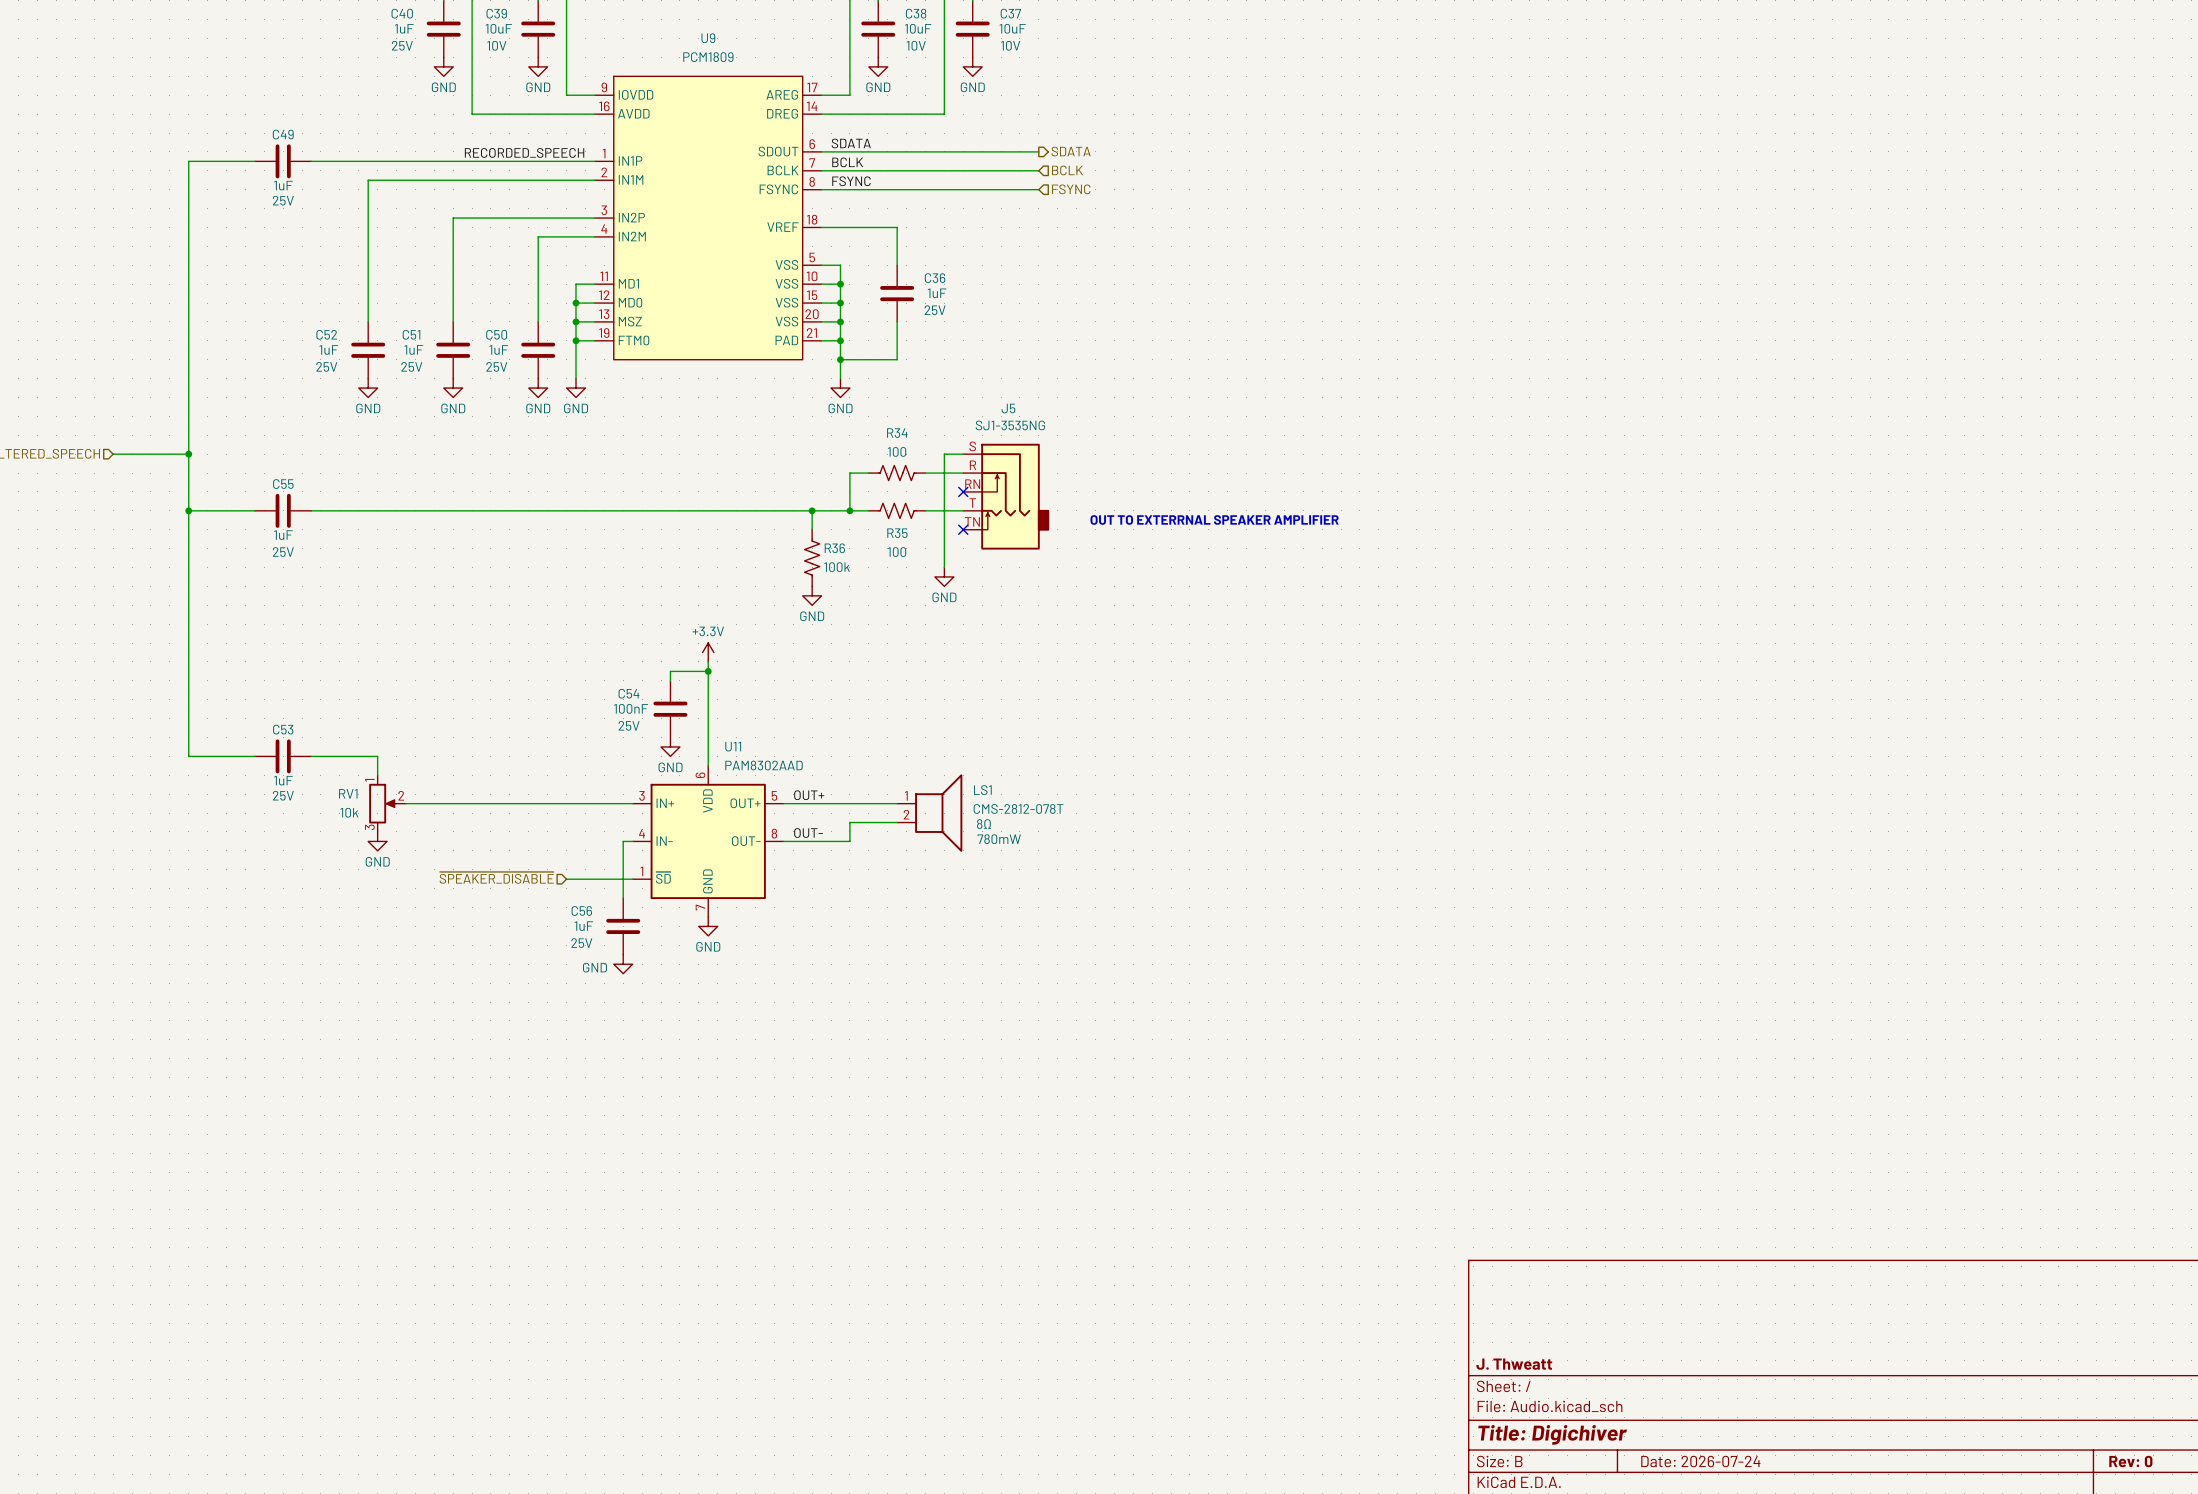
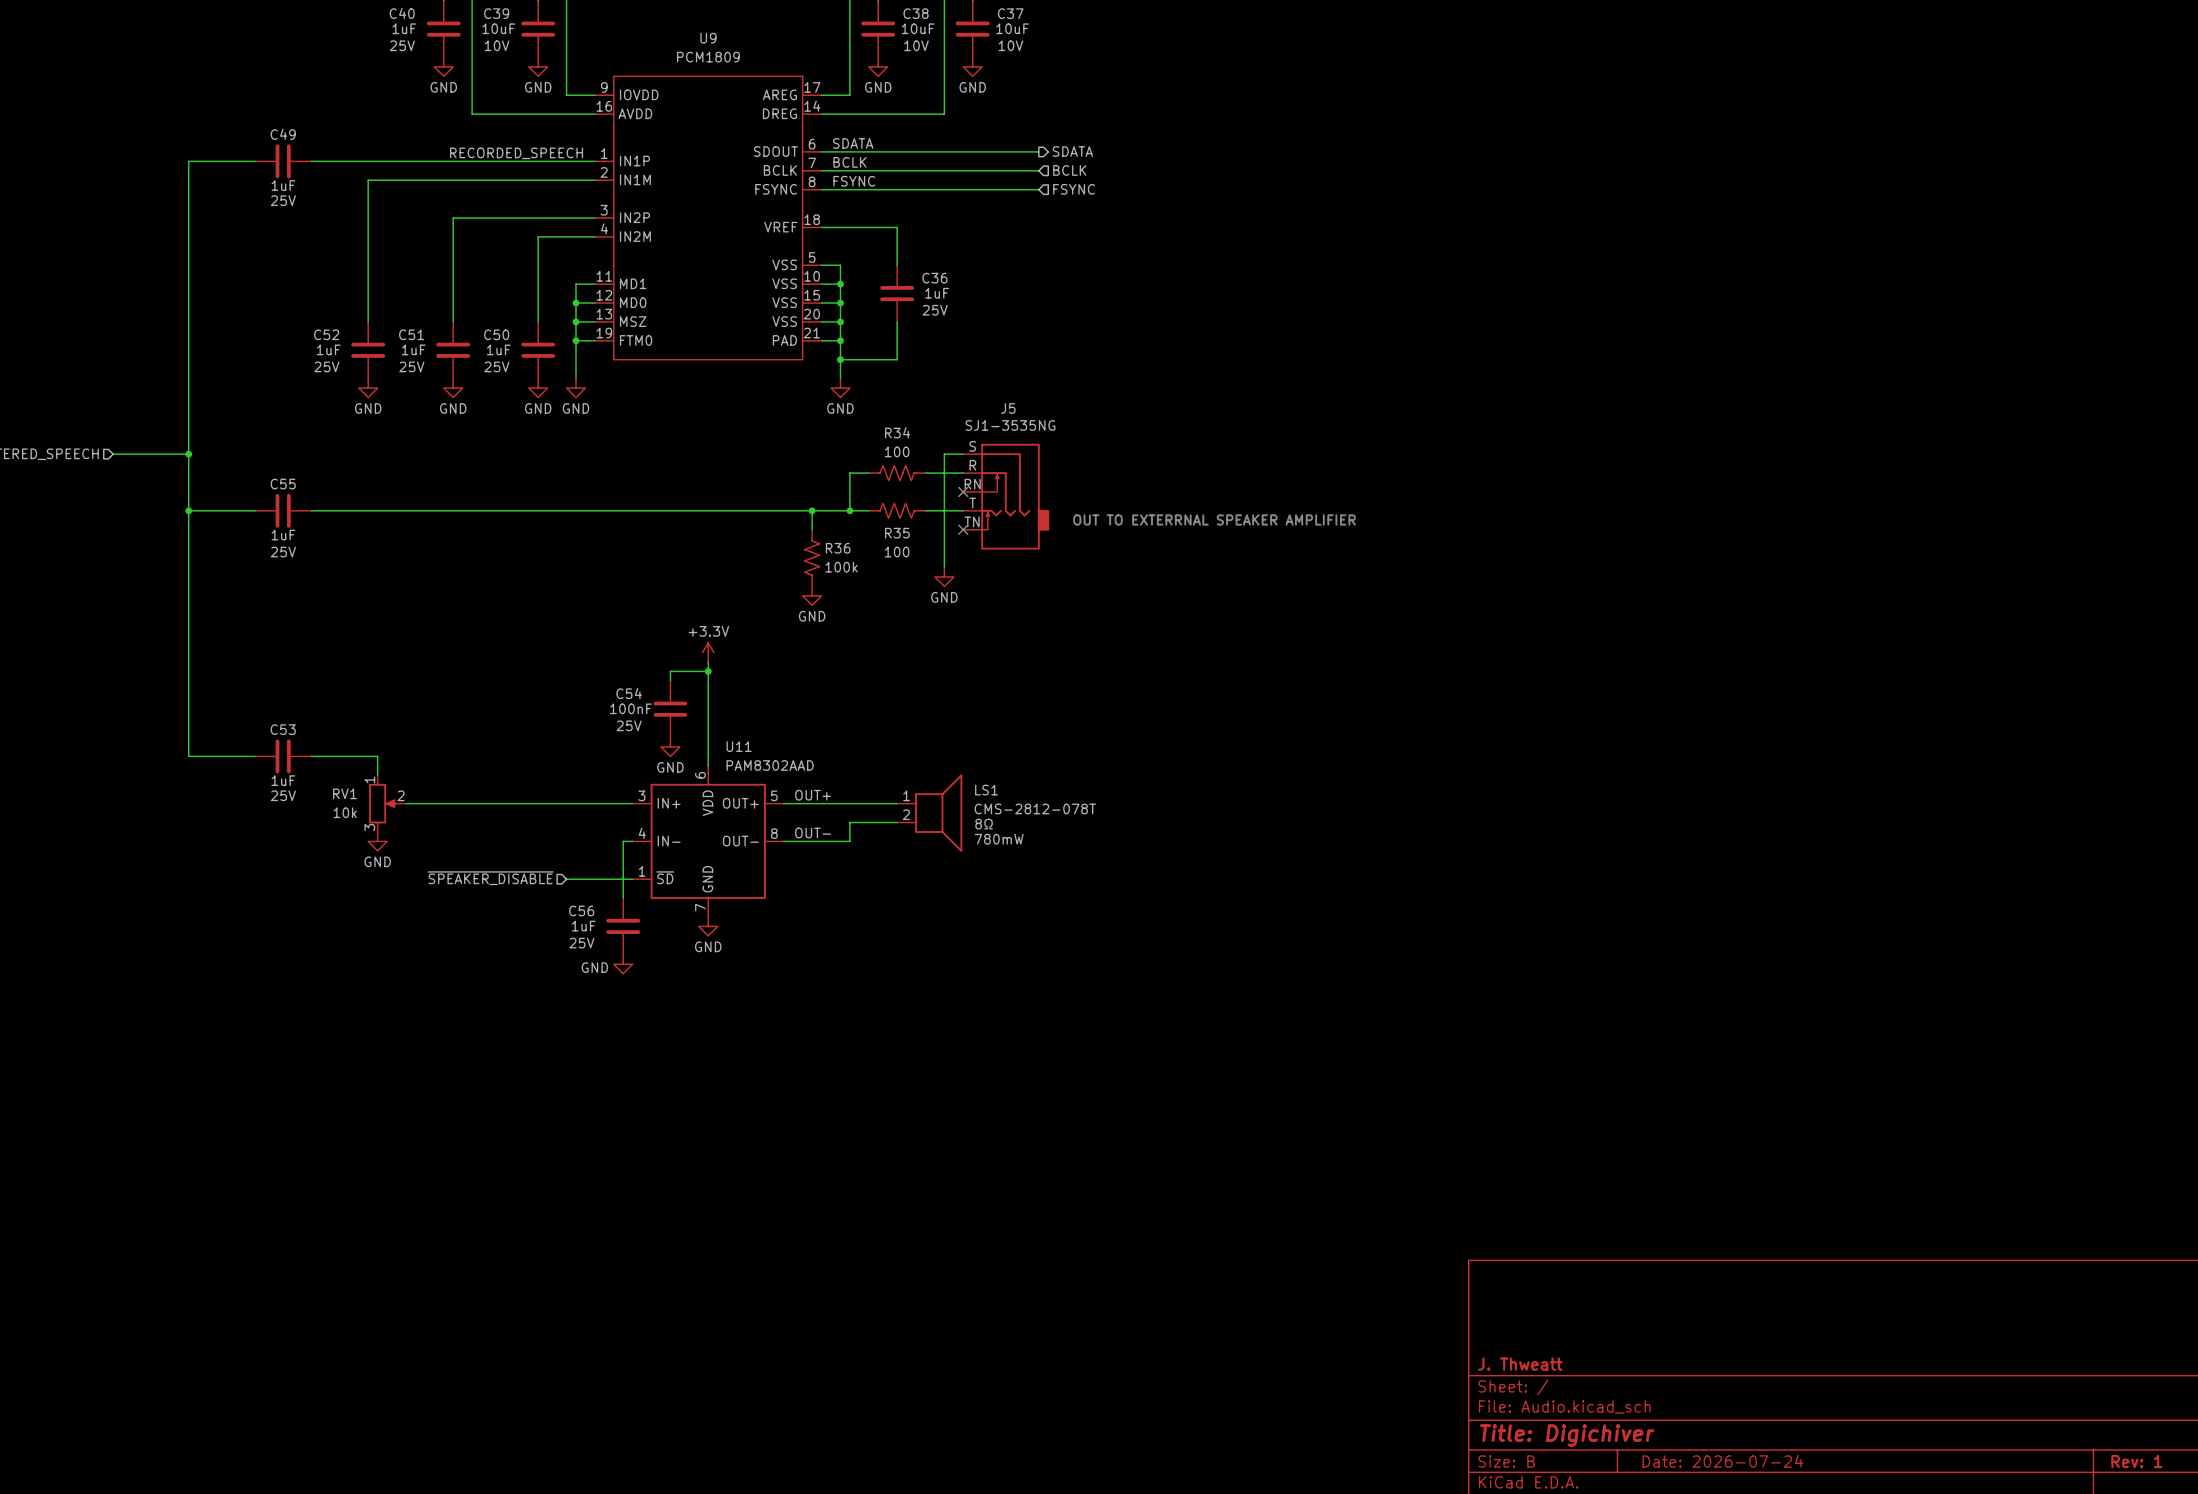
title block: Rev: 0 (2130, 1461) -> Rev: 1 (2136, 1461)

